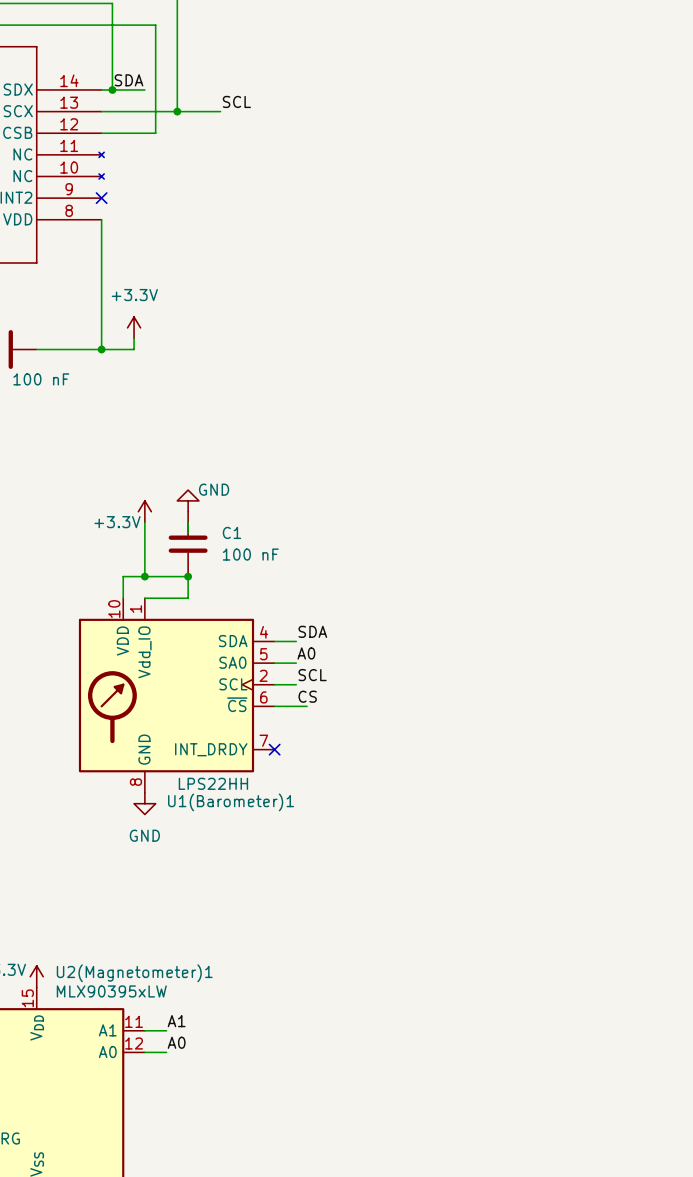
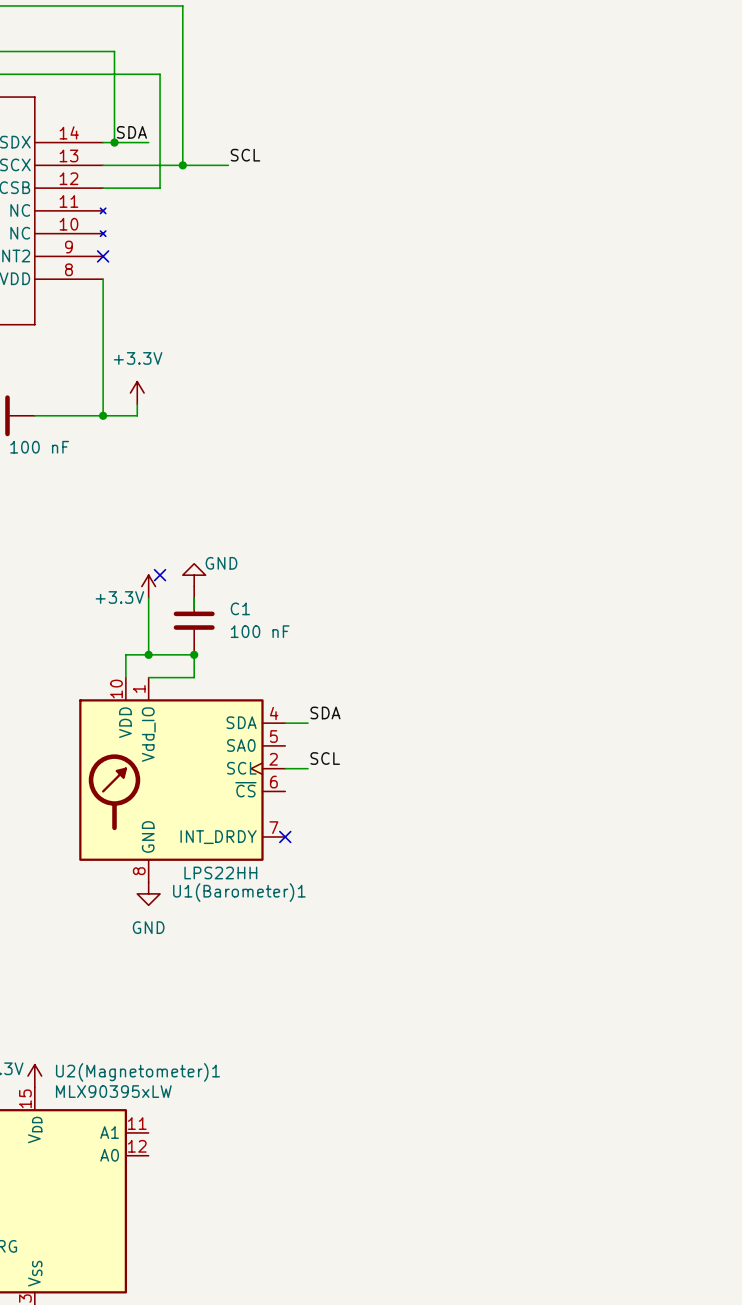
no-connect mark: none -> (160, 575)
label: A0 (306, 653) -> none
wire: (274, 663) (296, 663) -> none
label: CS (307, 696) -> none
wire: (274, 706) (307, 706) -> none
label: A1 (176, 1021) -> none
wire: (144, 1030) (166, 1030) -> none
label: A0 (176, 1042) -> none
wire: (144, 1052) (166, 1052) -> none

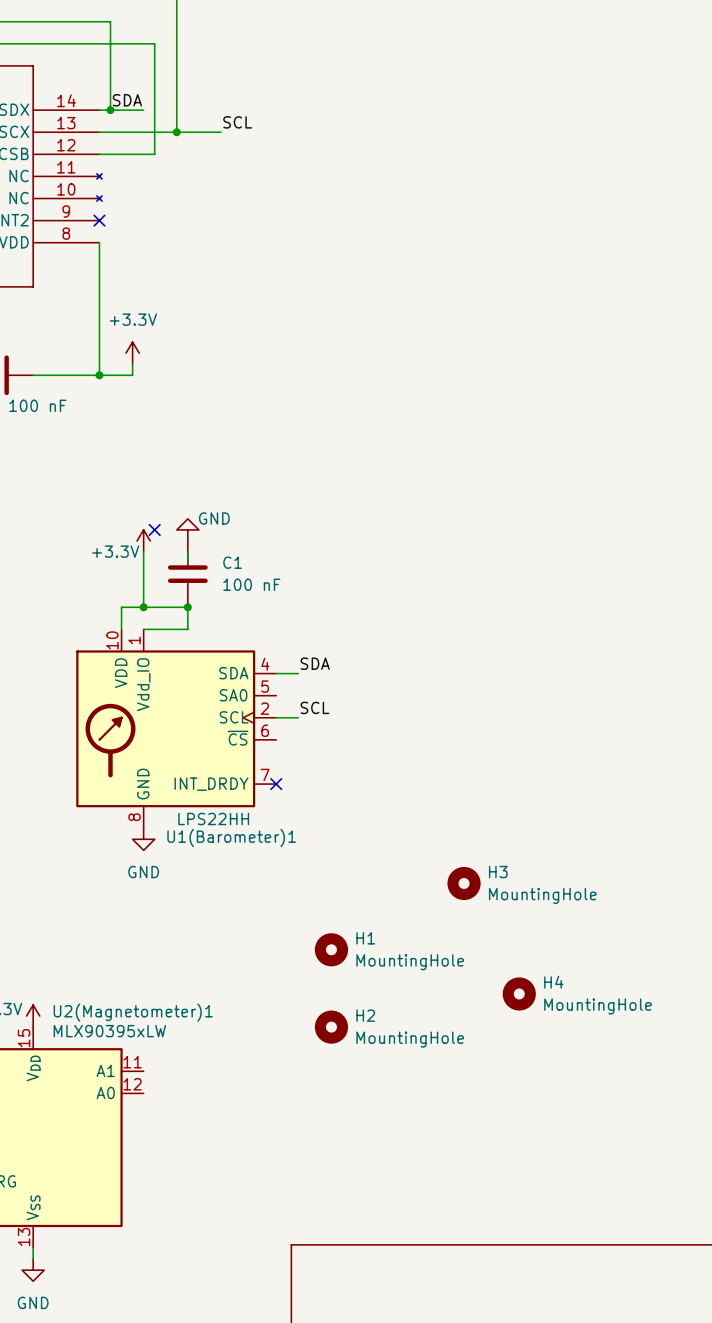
H3: none -> MountingHole (464, 883)
H1: none -> MountingHole (331, 949)
H4: none -> MountingHole (519, 993)
H2: none -> MountingHole (331, 1027)

